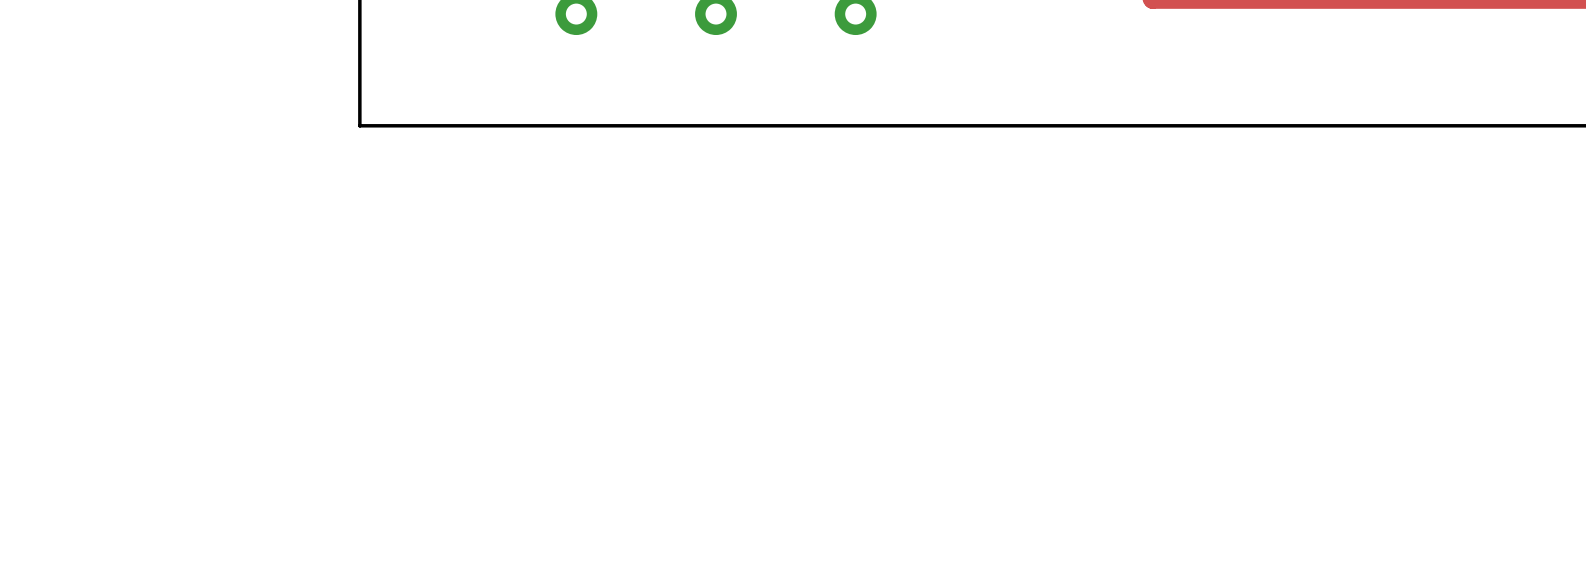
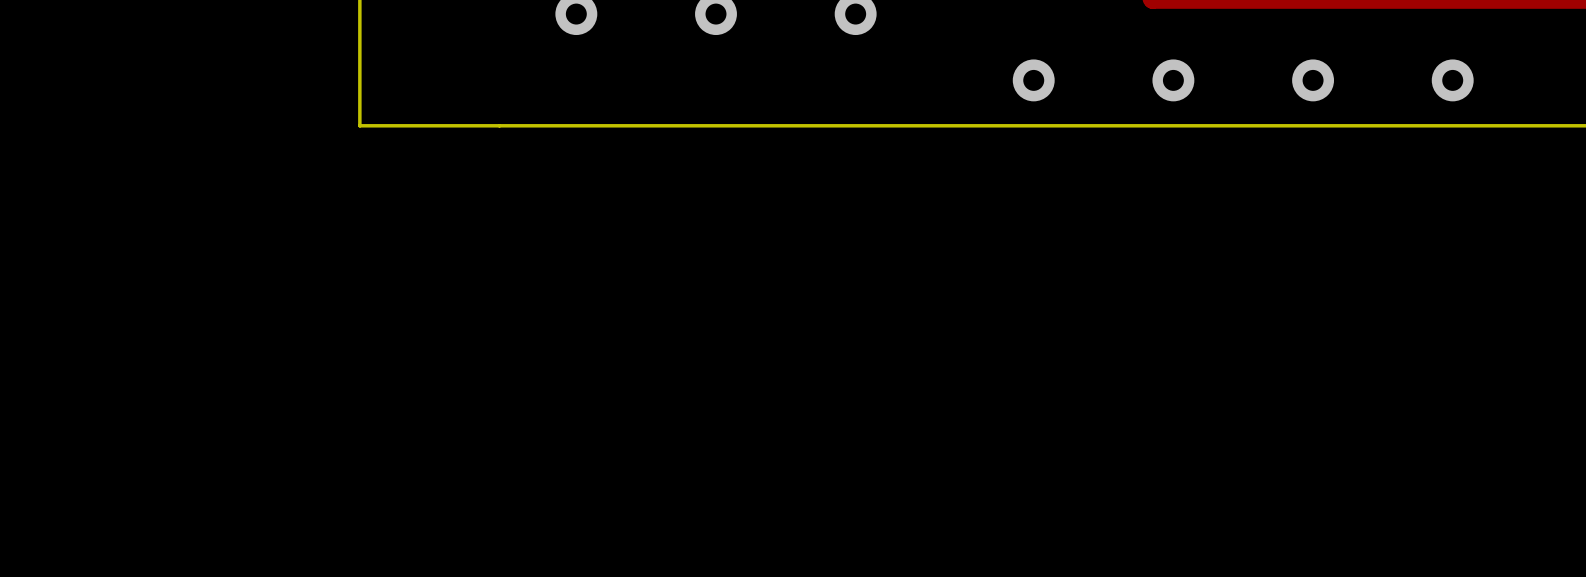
via: none -> (1033, 80)
via: none -> (1173, 80)
via: none -> (1313, 80)
via: none -> (1452, 80)

